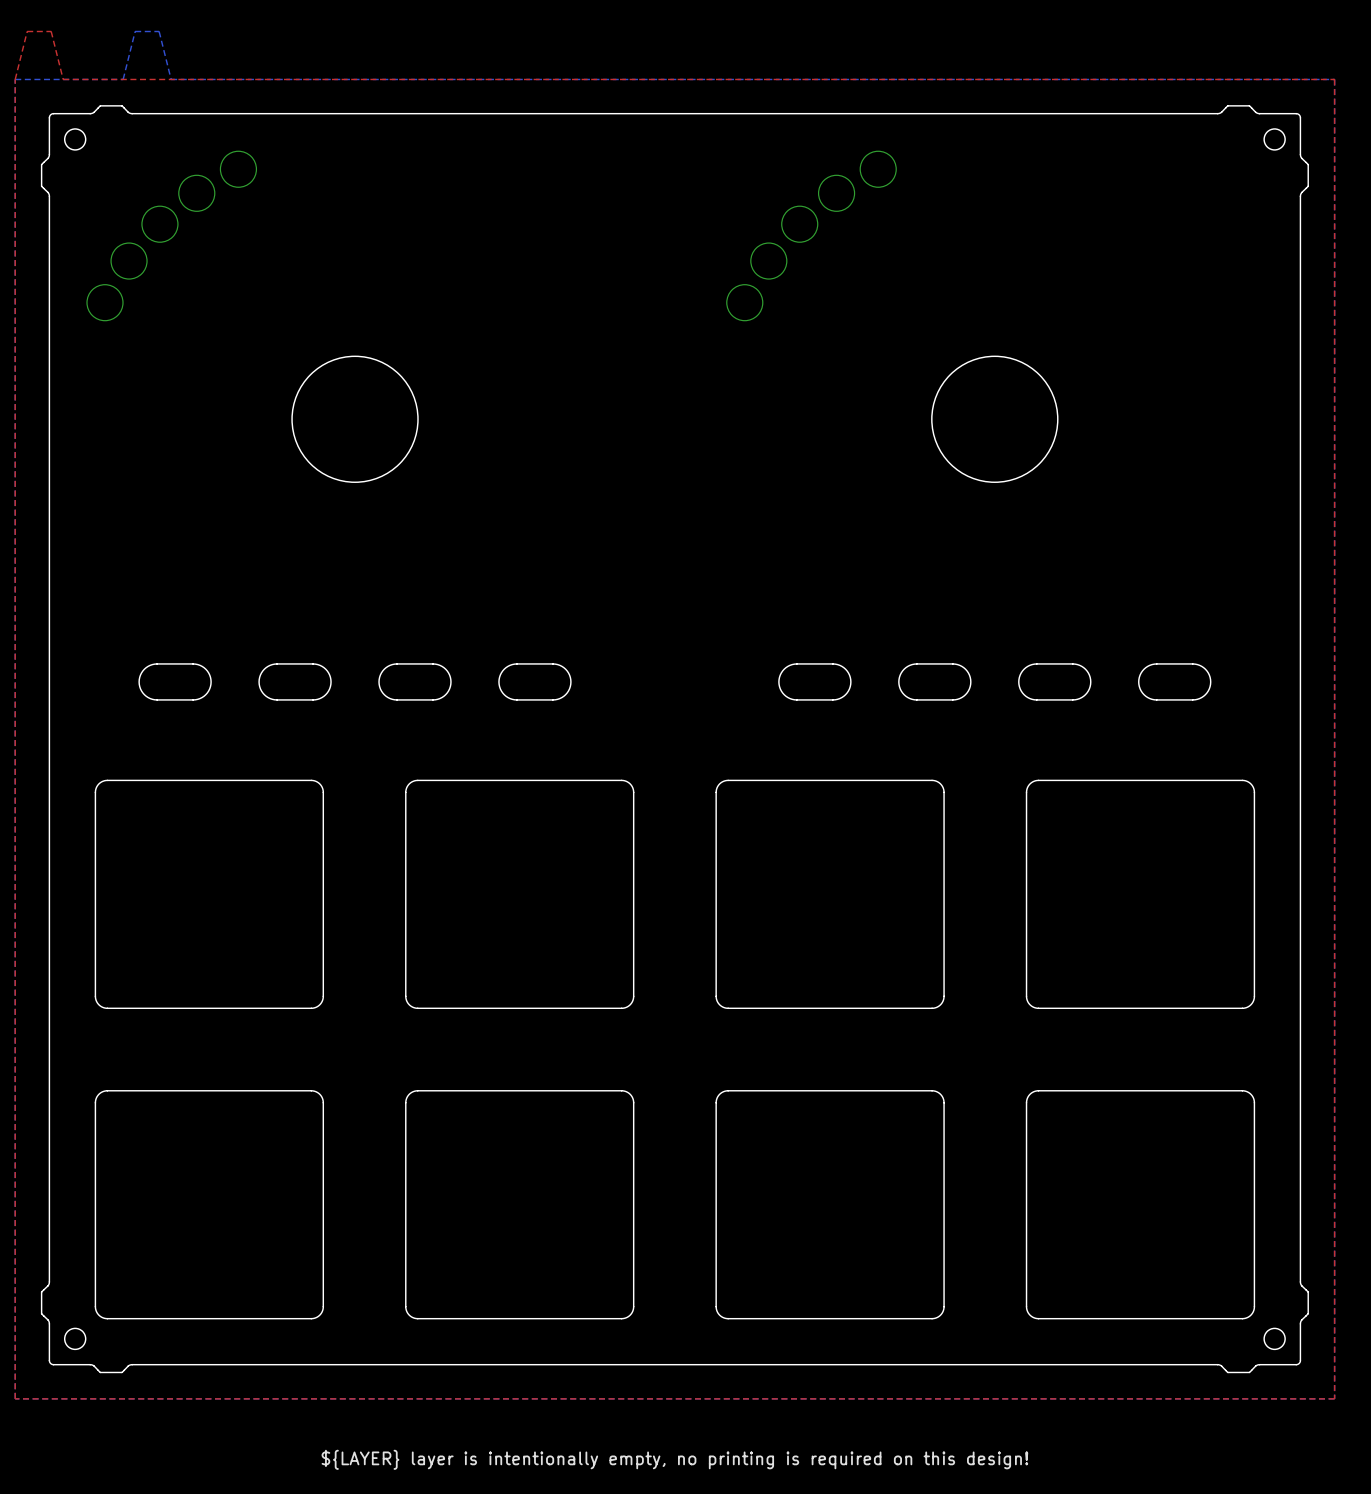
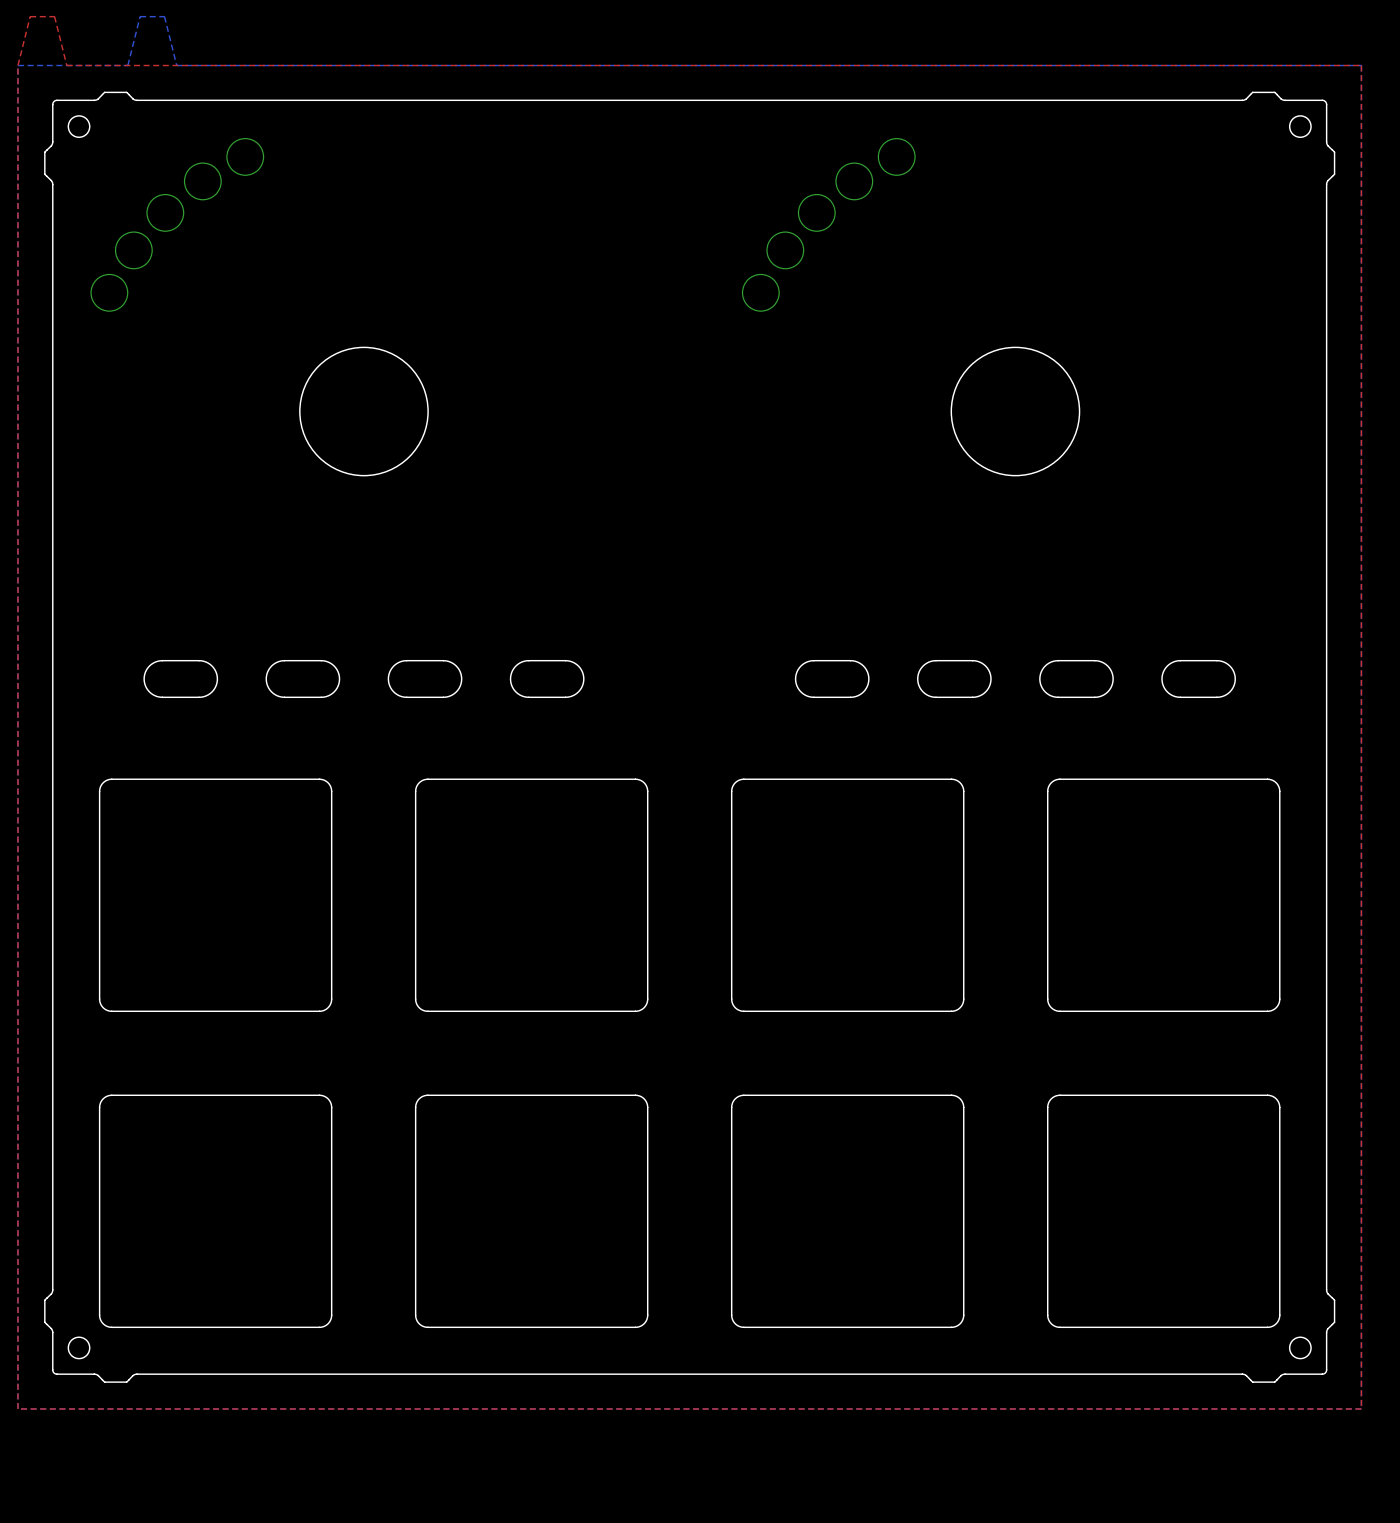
text: ${LAYER} layer is intentionally empty, no printing is required on this design! (674, 1459) -> none

